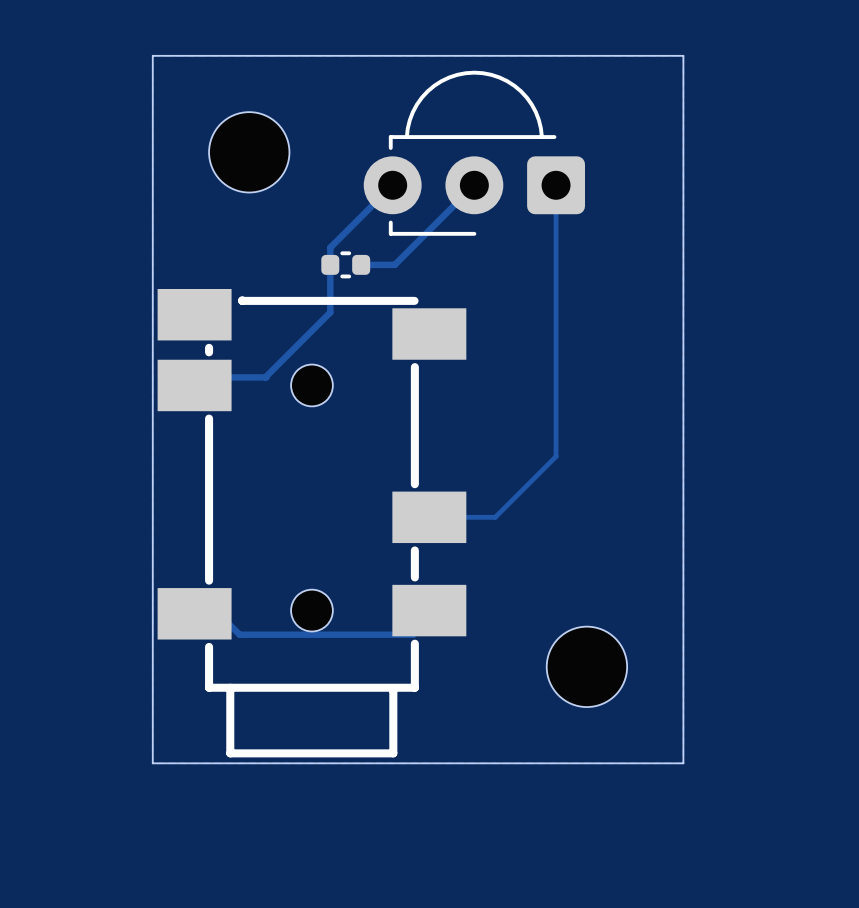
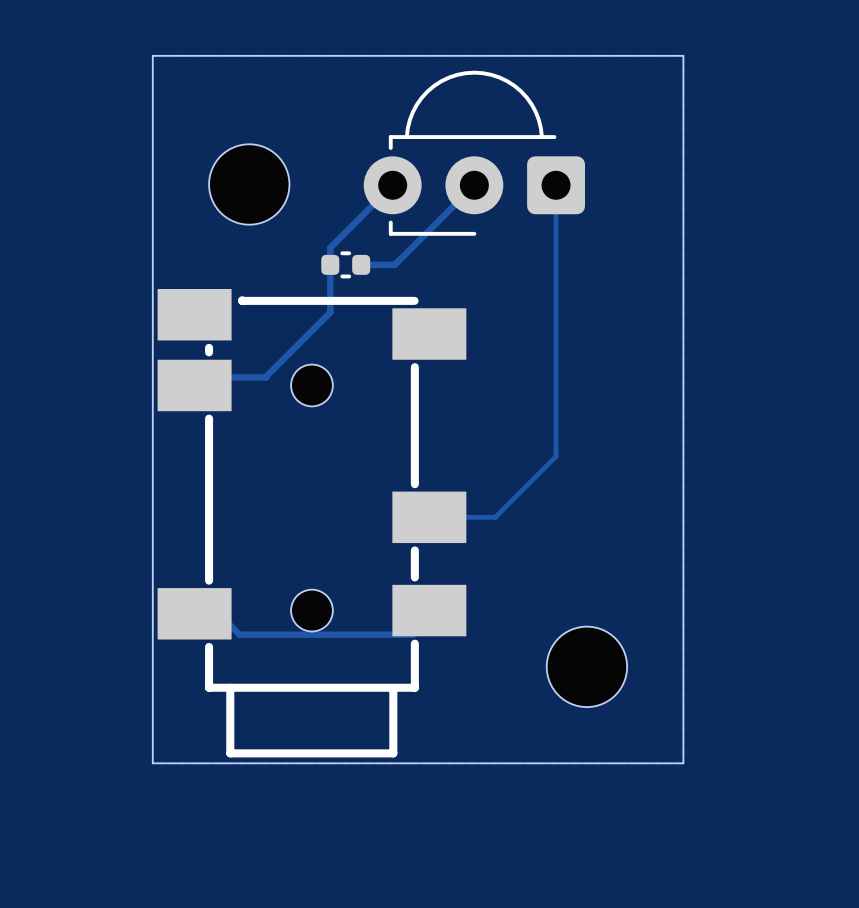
part position: (249, 152) -> (249, 184)

